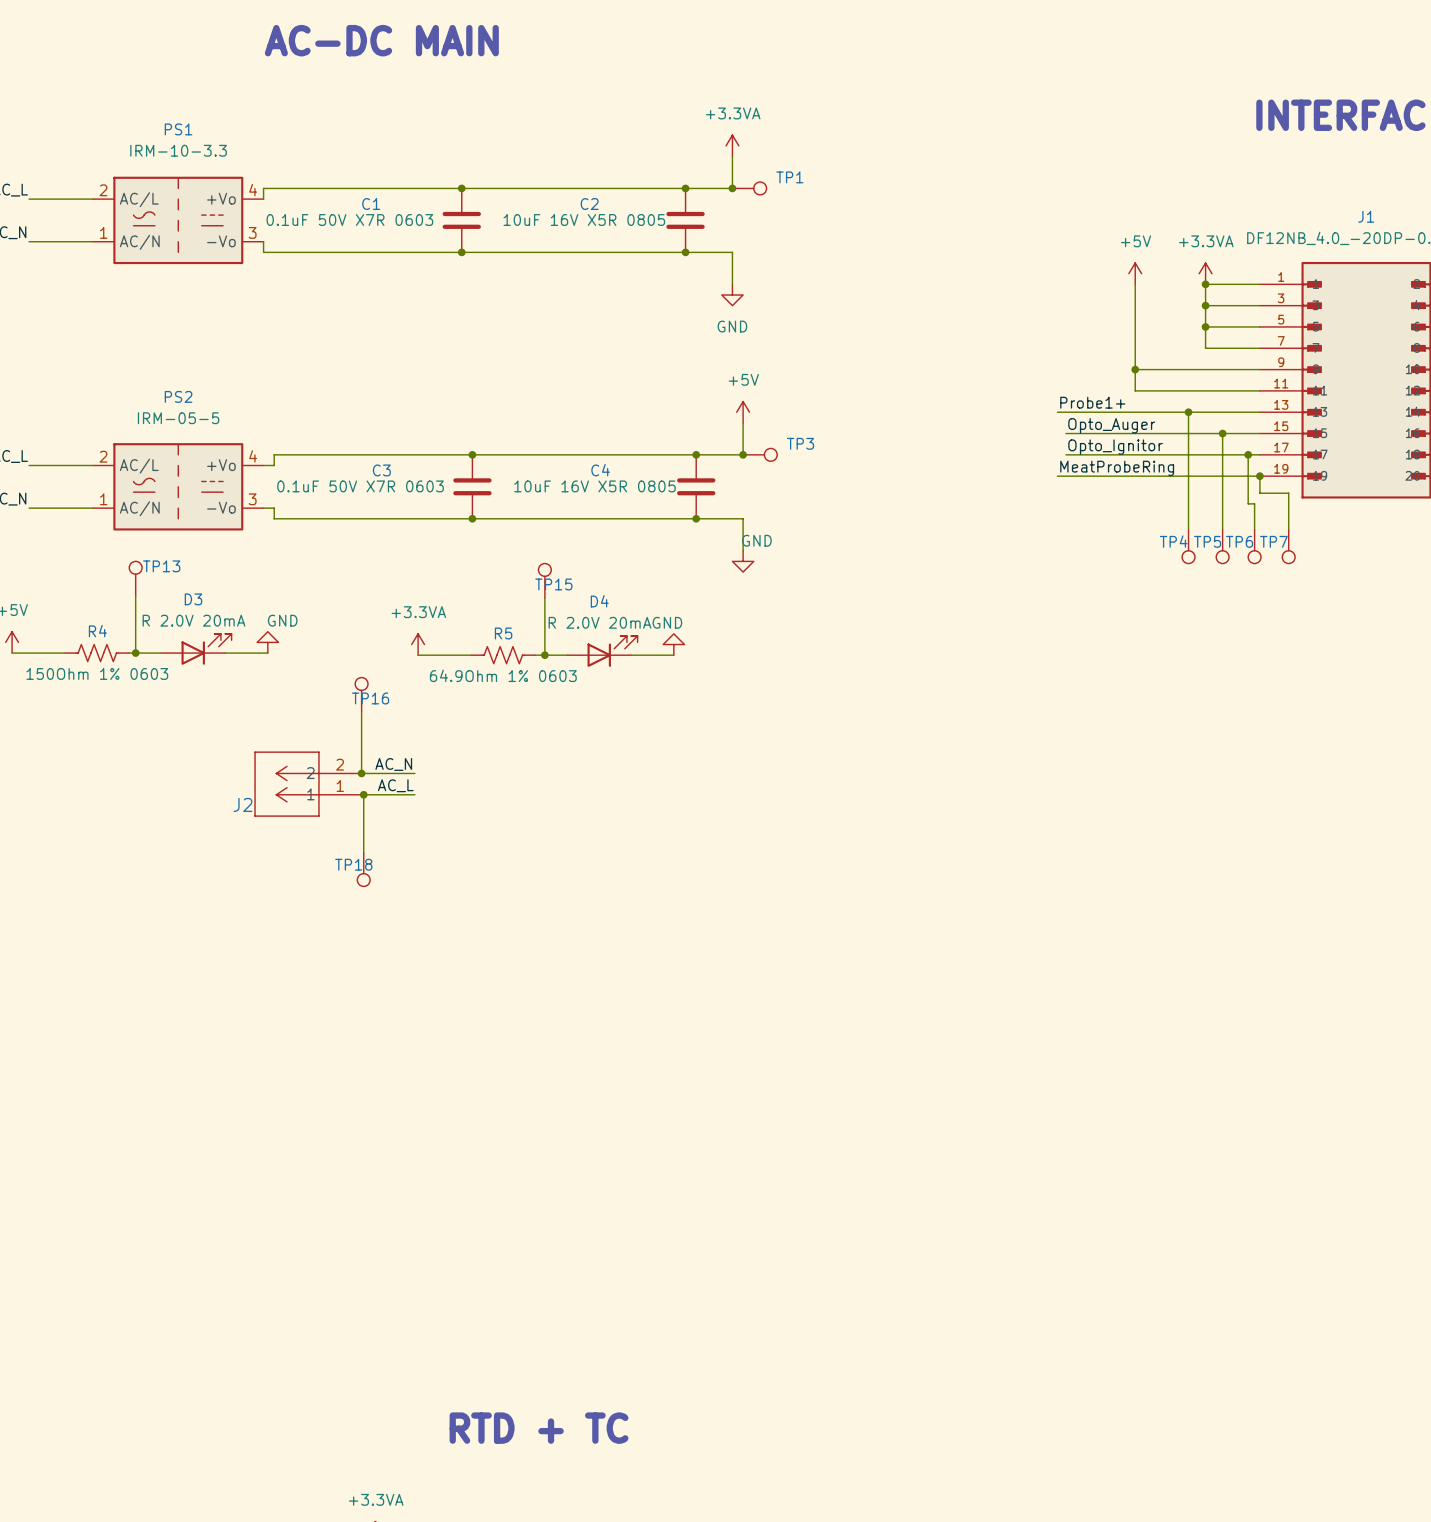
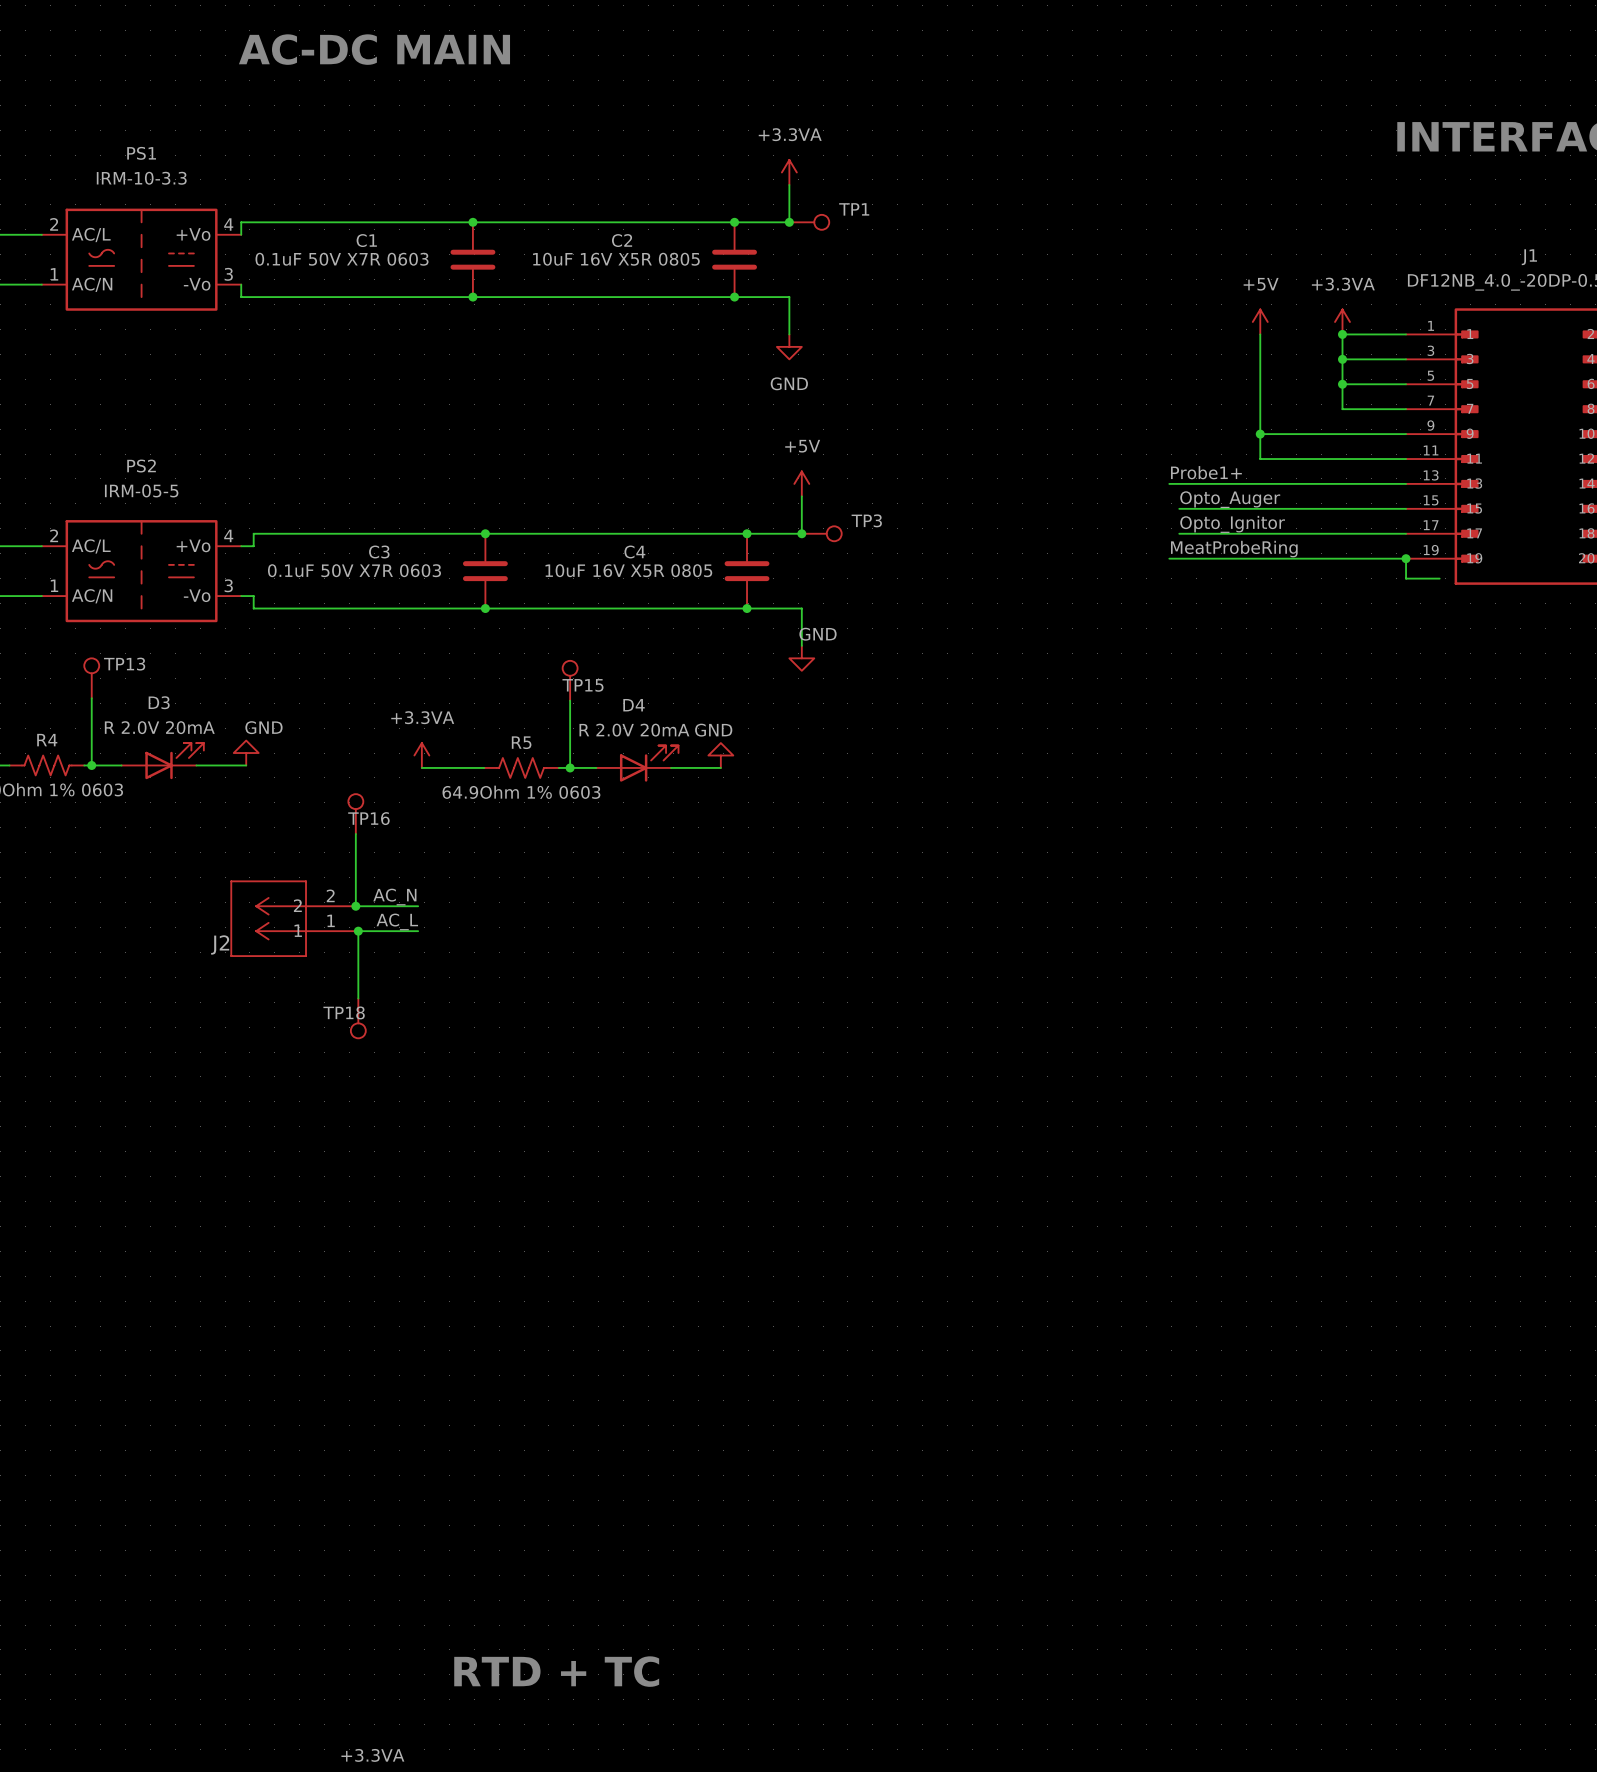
wire: (1188, 412) (1188, 529) -> none
junction: (1188, 412) -> none
wire: (1222, 433) (1222, 529) -> none
junction: (1222, 433) -> none
wire: (1248, 454) (1248, 503) (1254, 503) (1254, 529) -> none
junction: (1248, 454) -> none
wire: (1288, 493) (1288, 529) -> none
TP4: (1188, 546) -> none
TP5: (1222, 546) -> none
TP6: (1254, 546) -> none
TP7: (1288, 546) -> none

